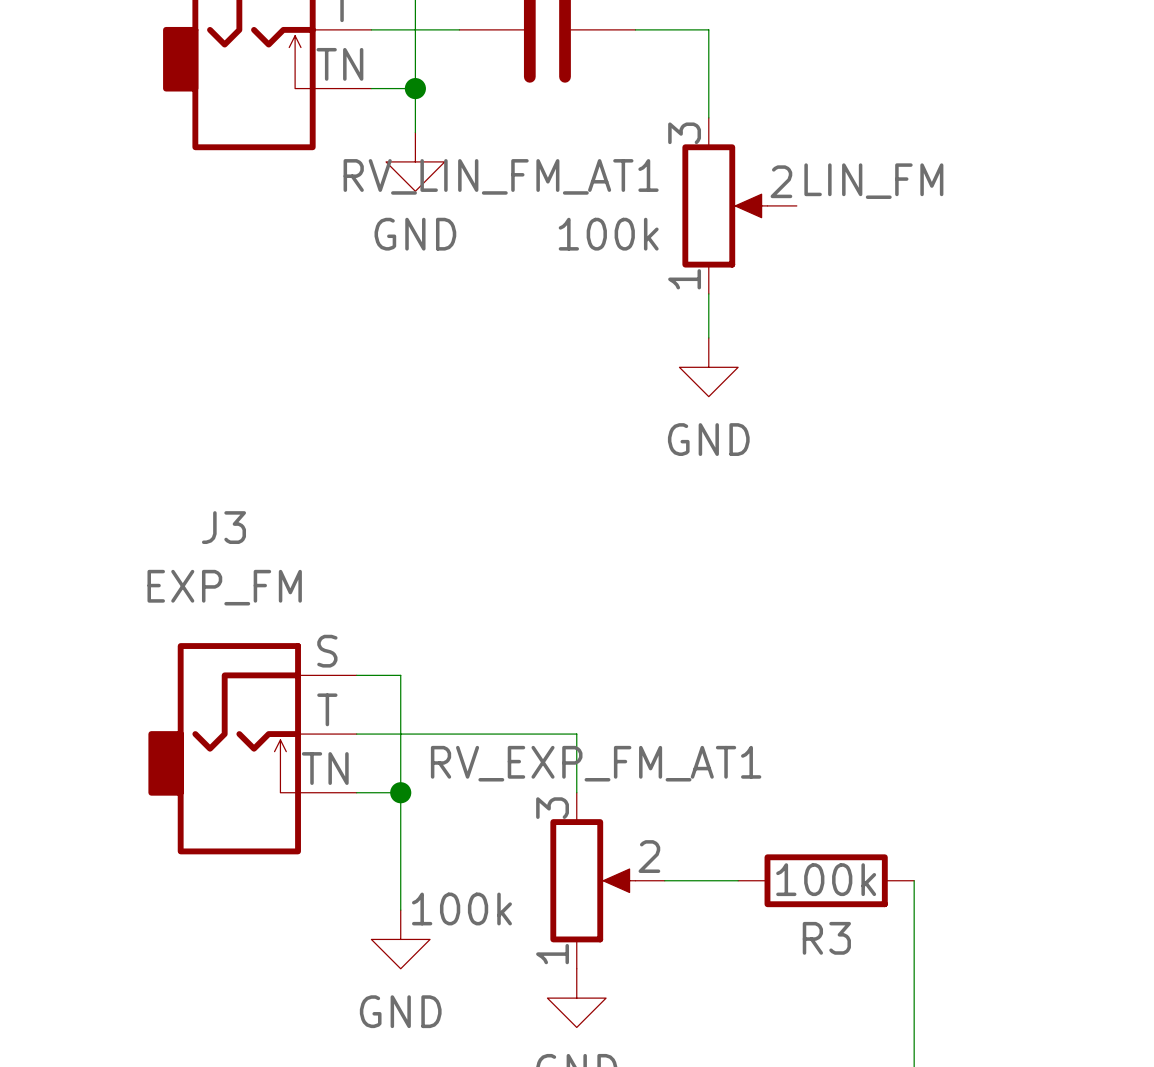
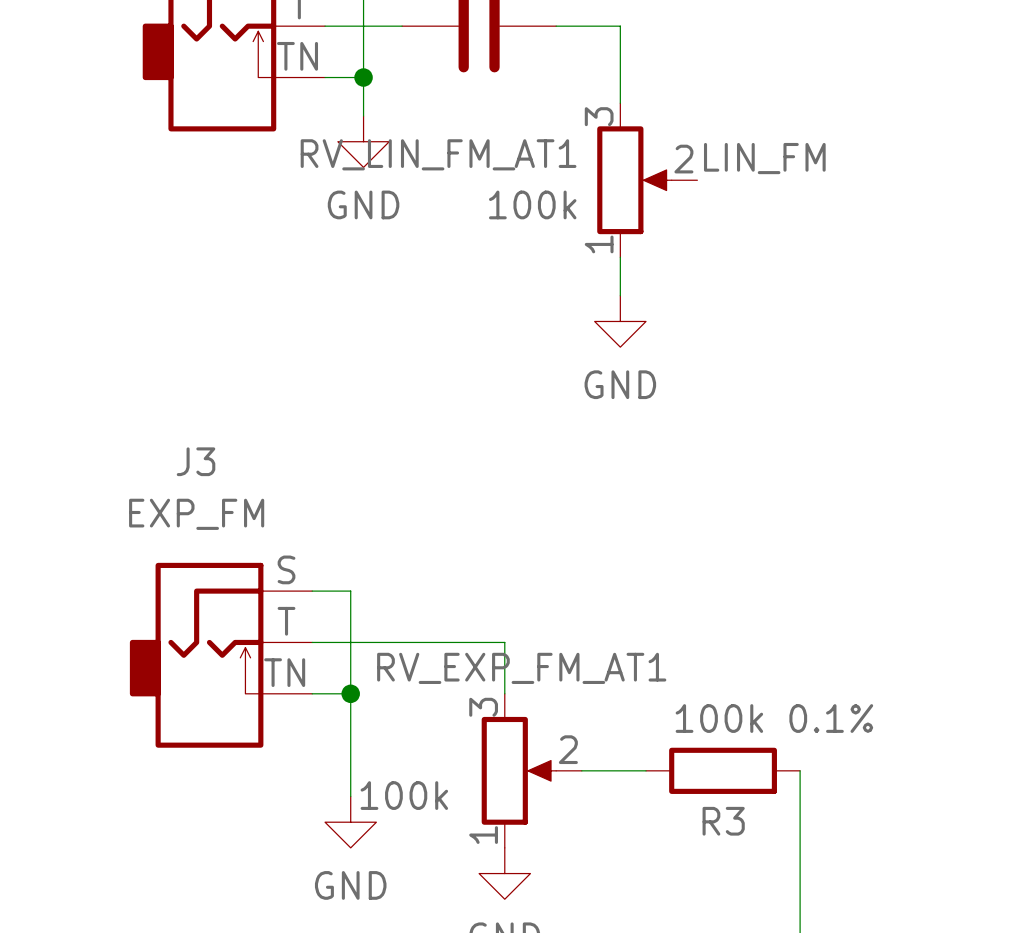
R3 value: 100k (826, 879) -> 100k 0.1% (774, 718)

